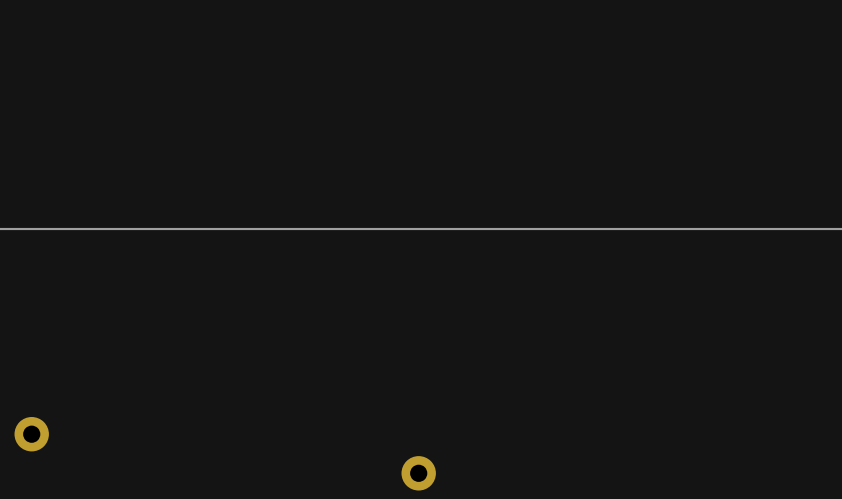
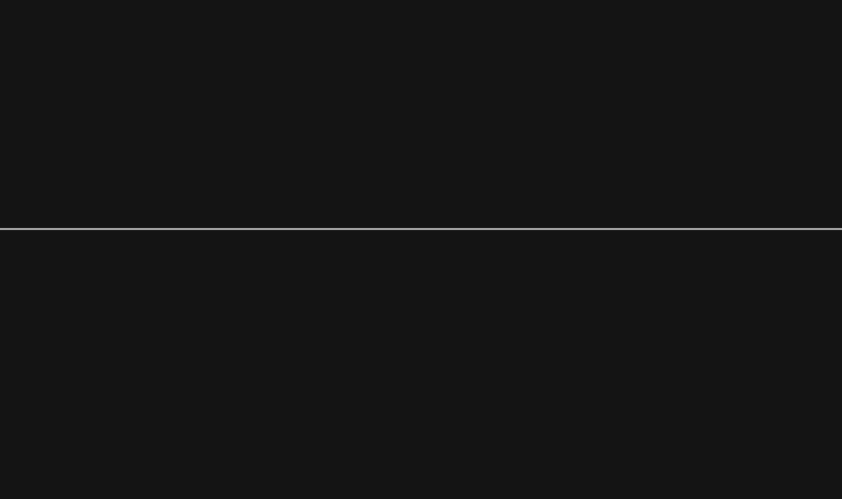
via: (31, 434) -> none
via: (418, 473) -> none

